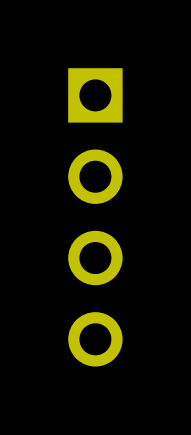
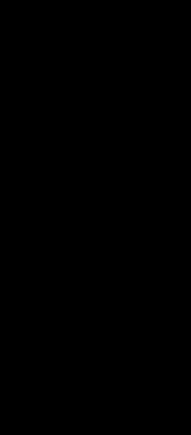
part: (95, 217) -> none

